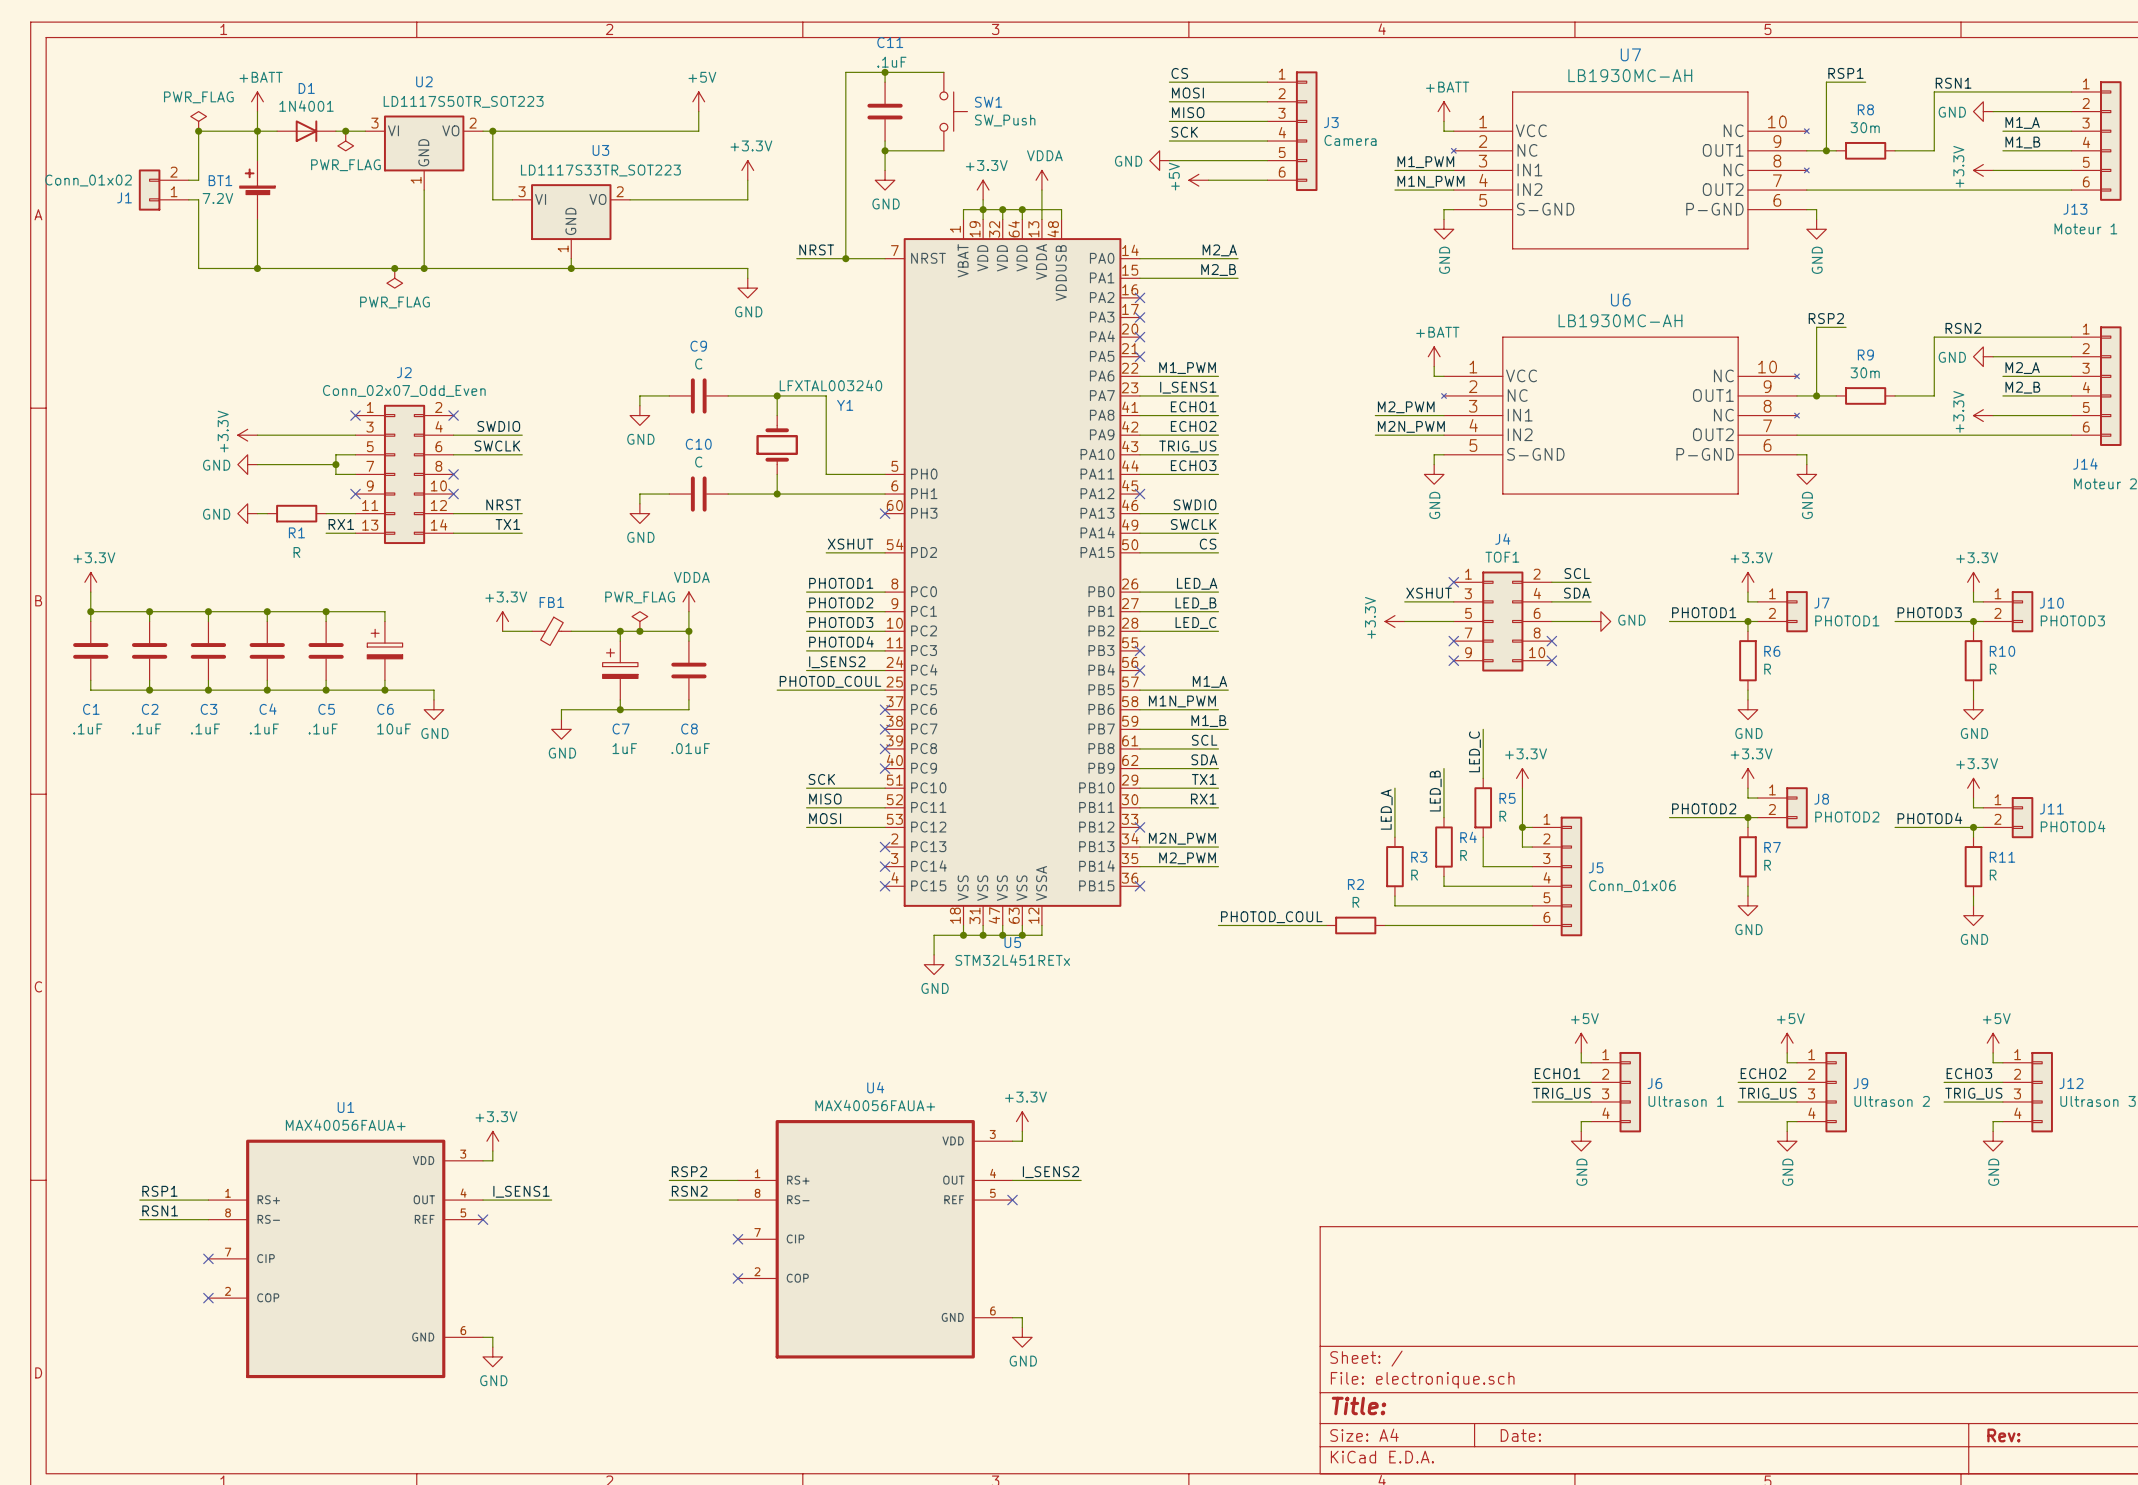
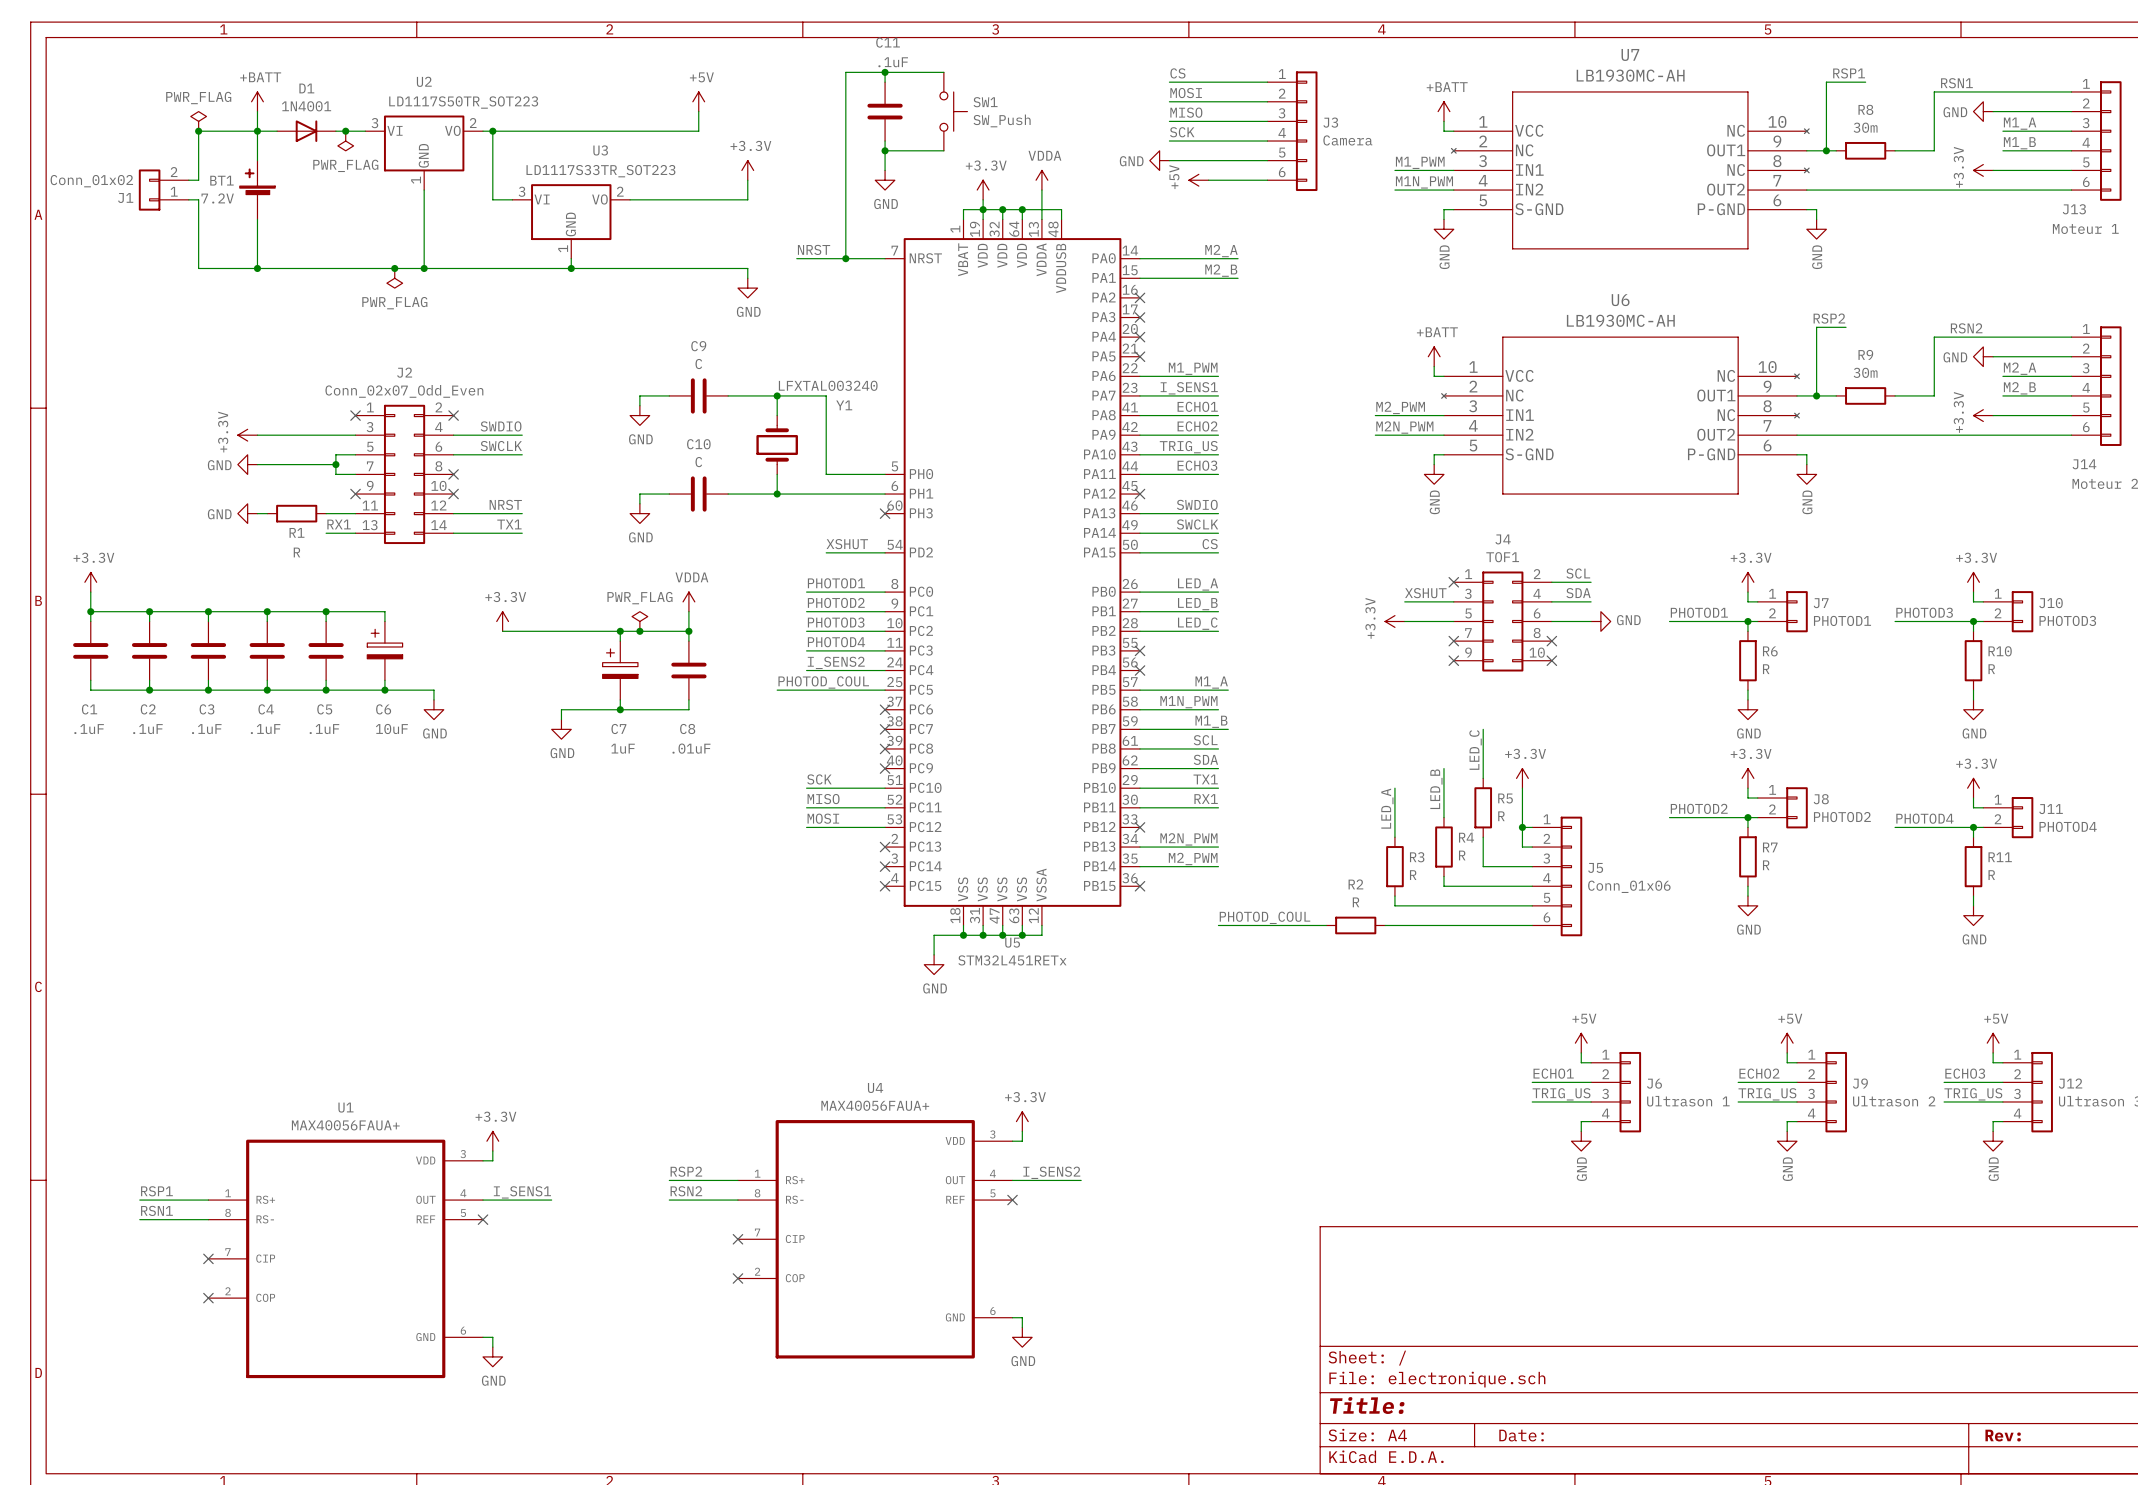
FB1: (551, 631) -> none

